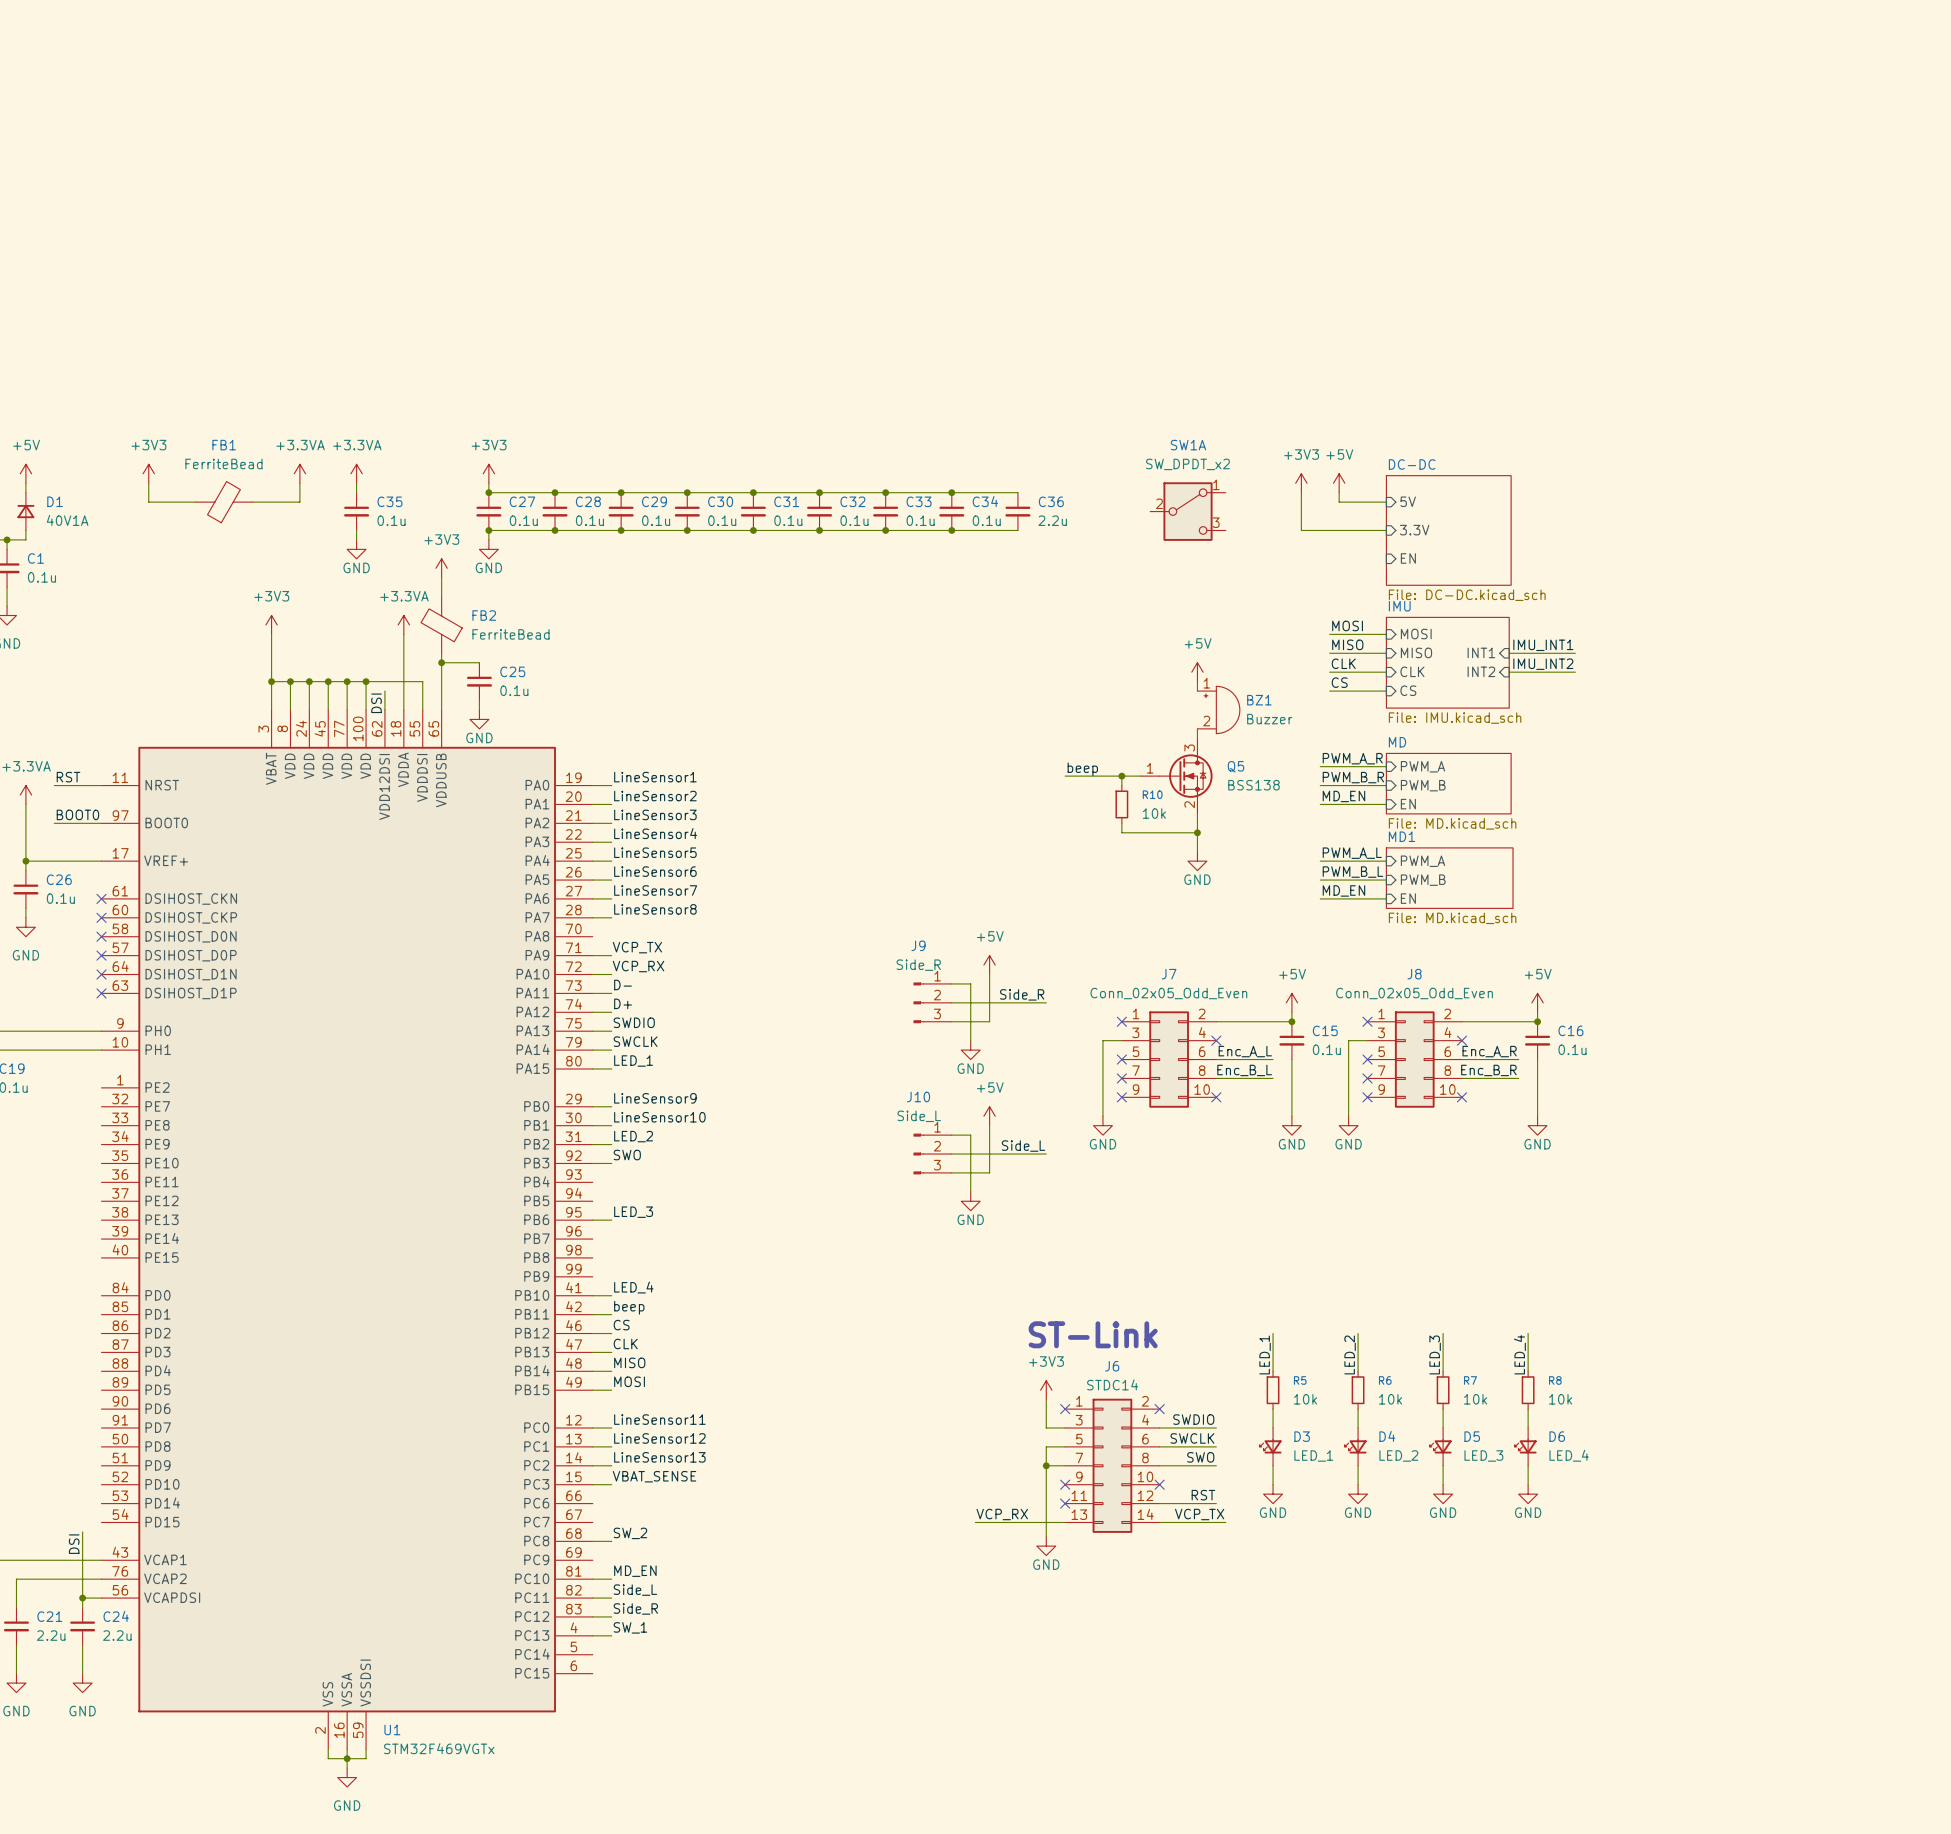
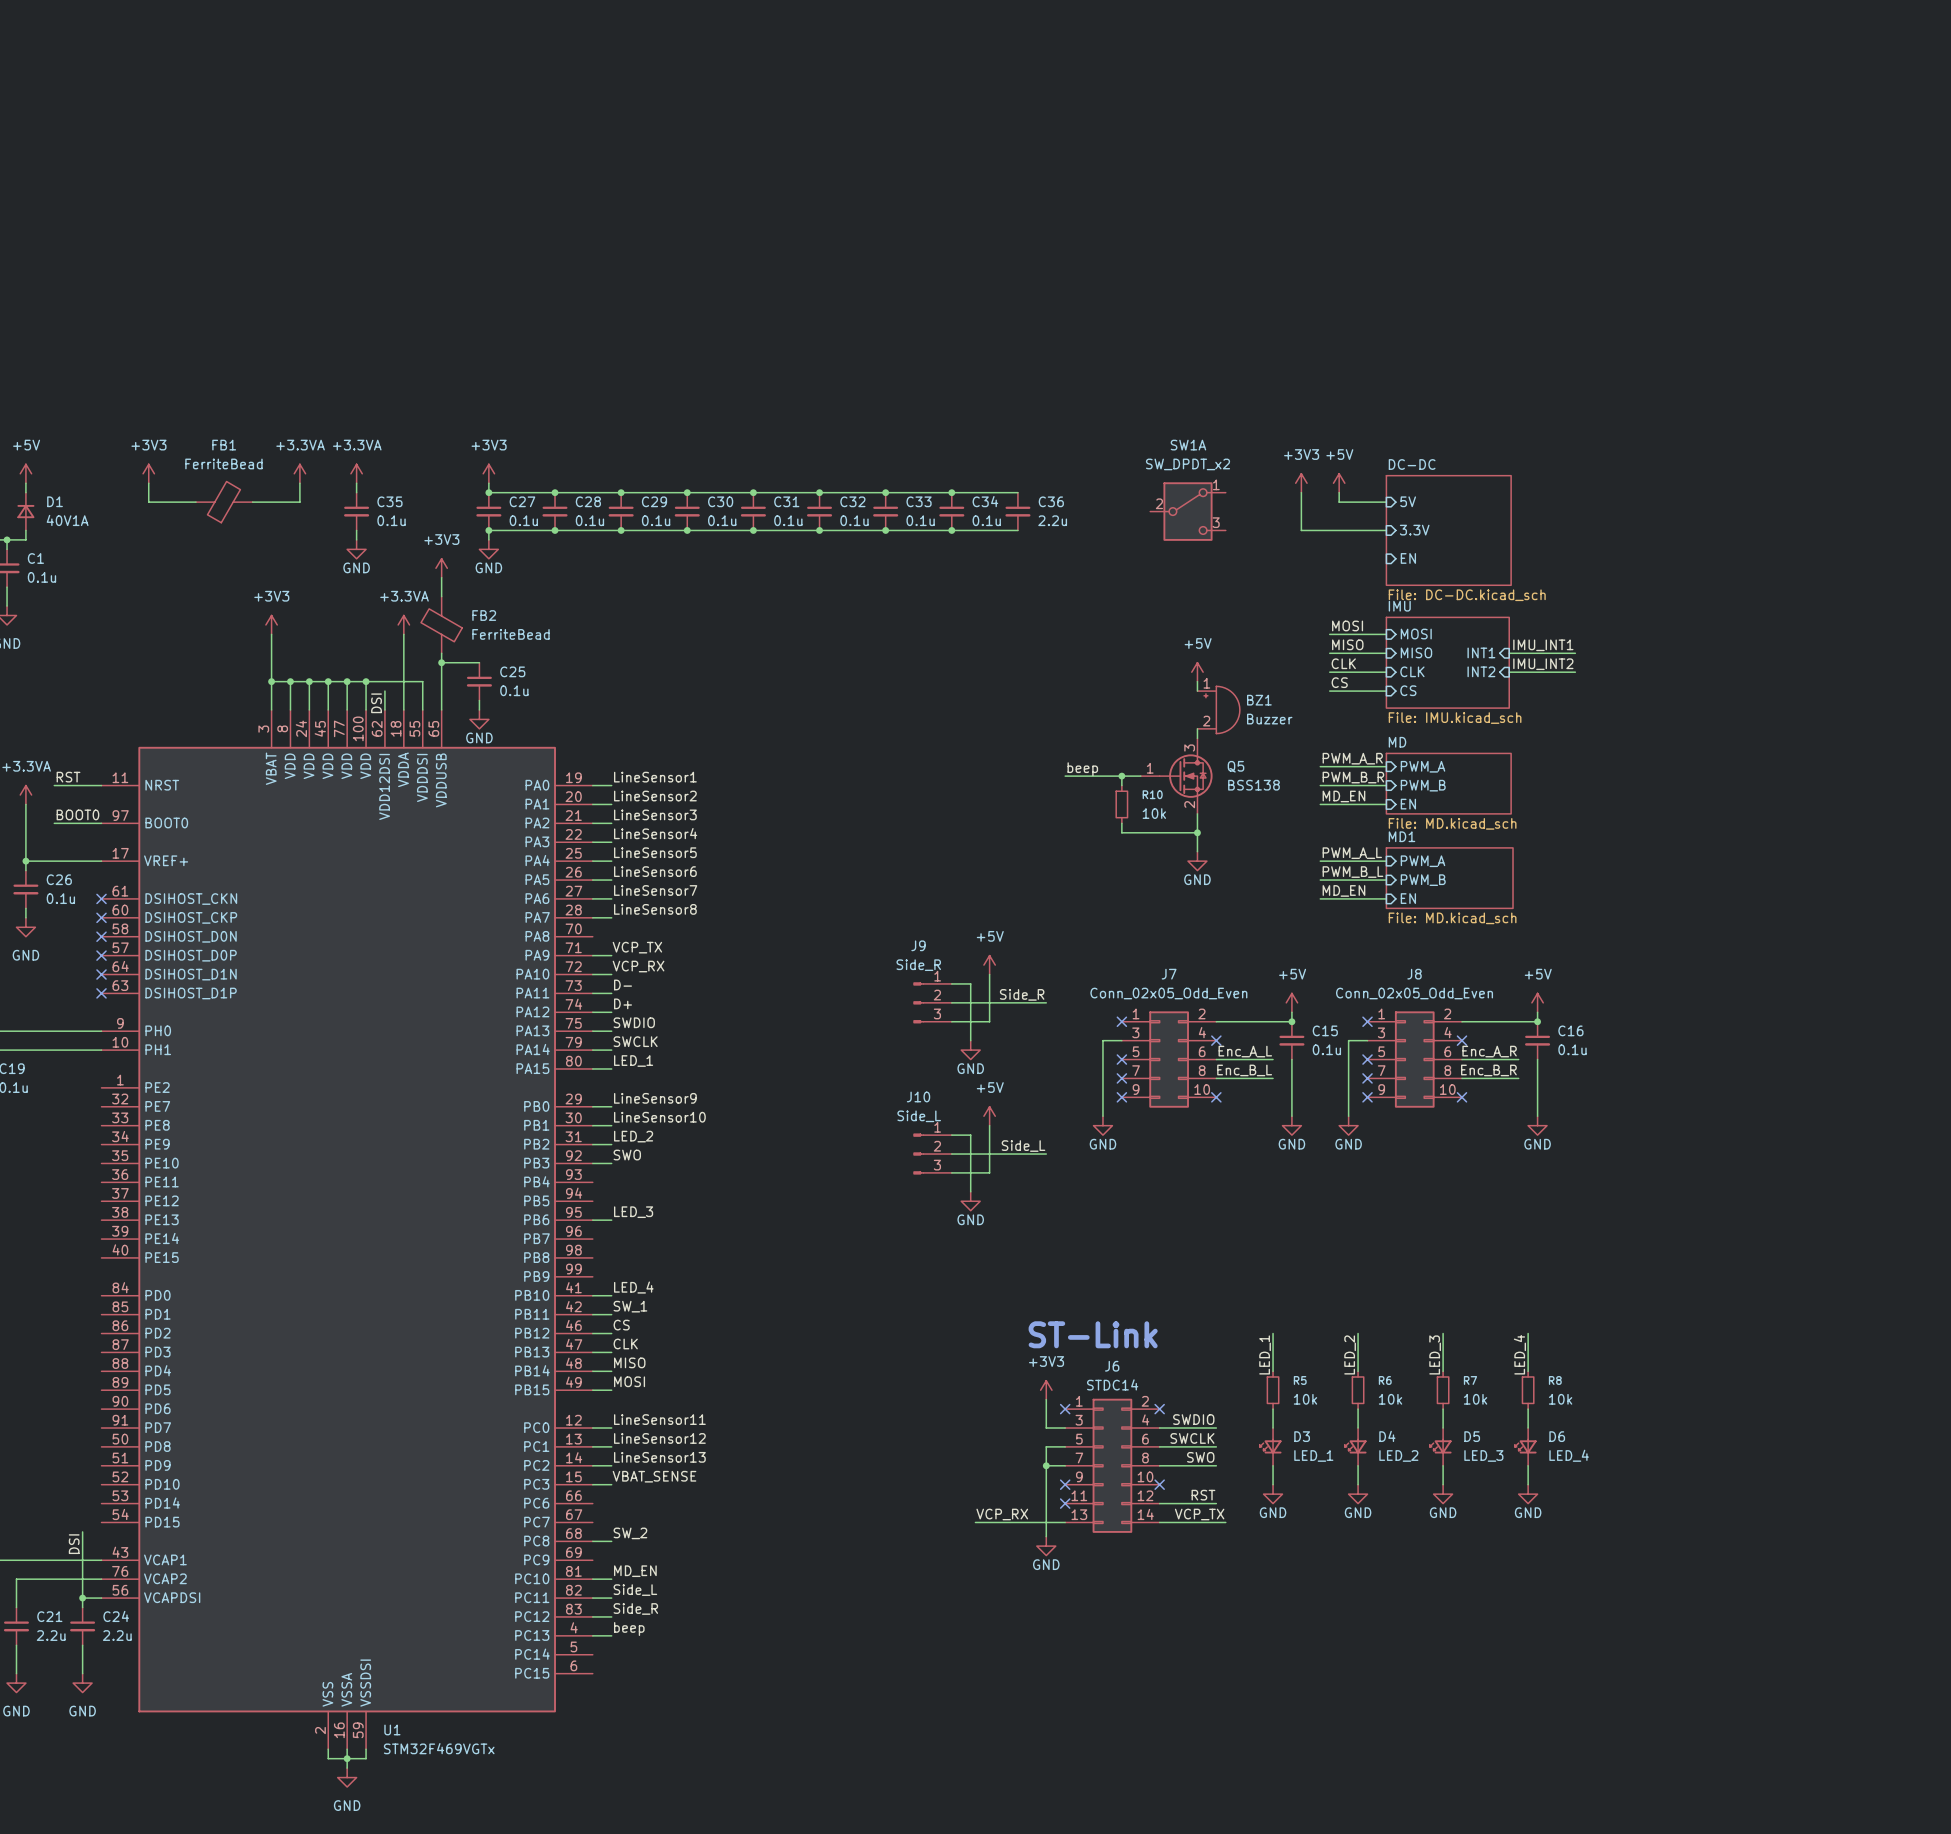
label: beep (629, 1307) -> SW_1 (630, 1306)
label: SW_1 (630, 1627) -> beep (629, 1629)

